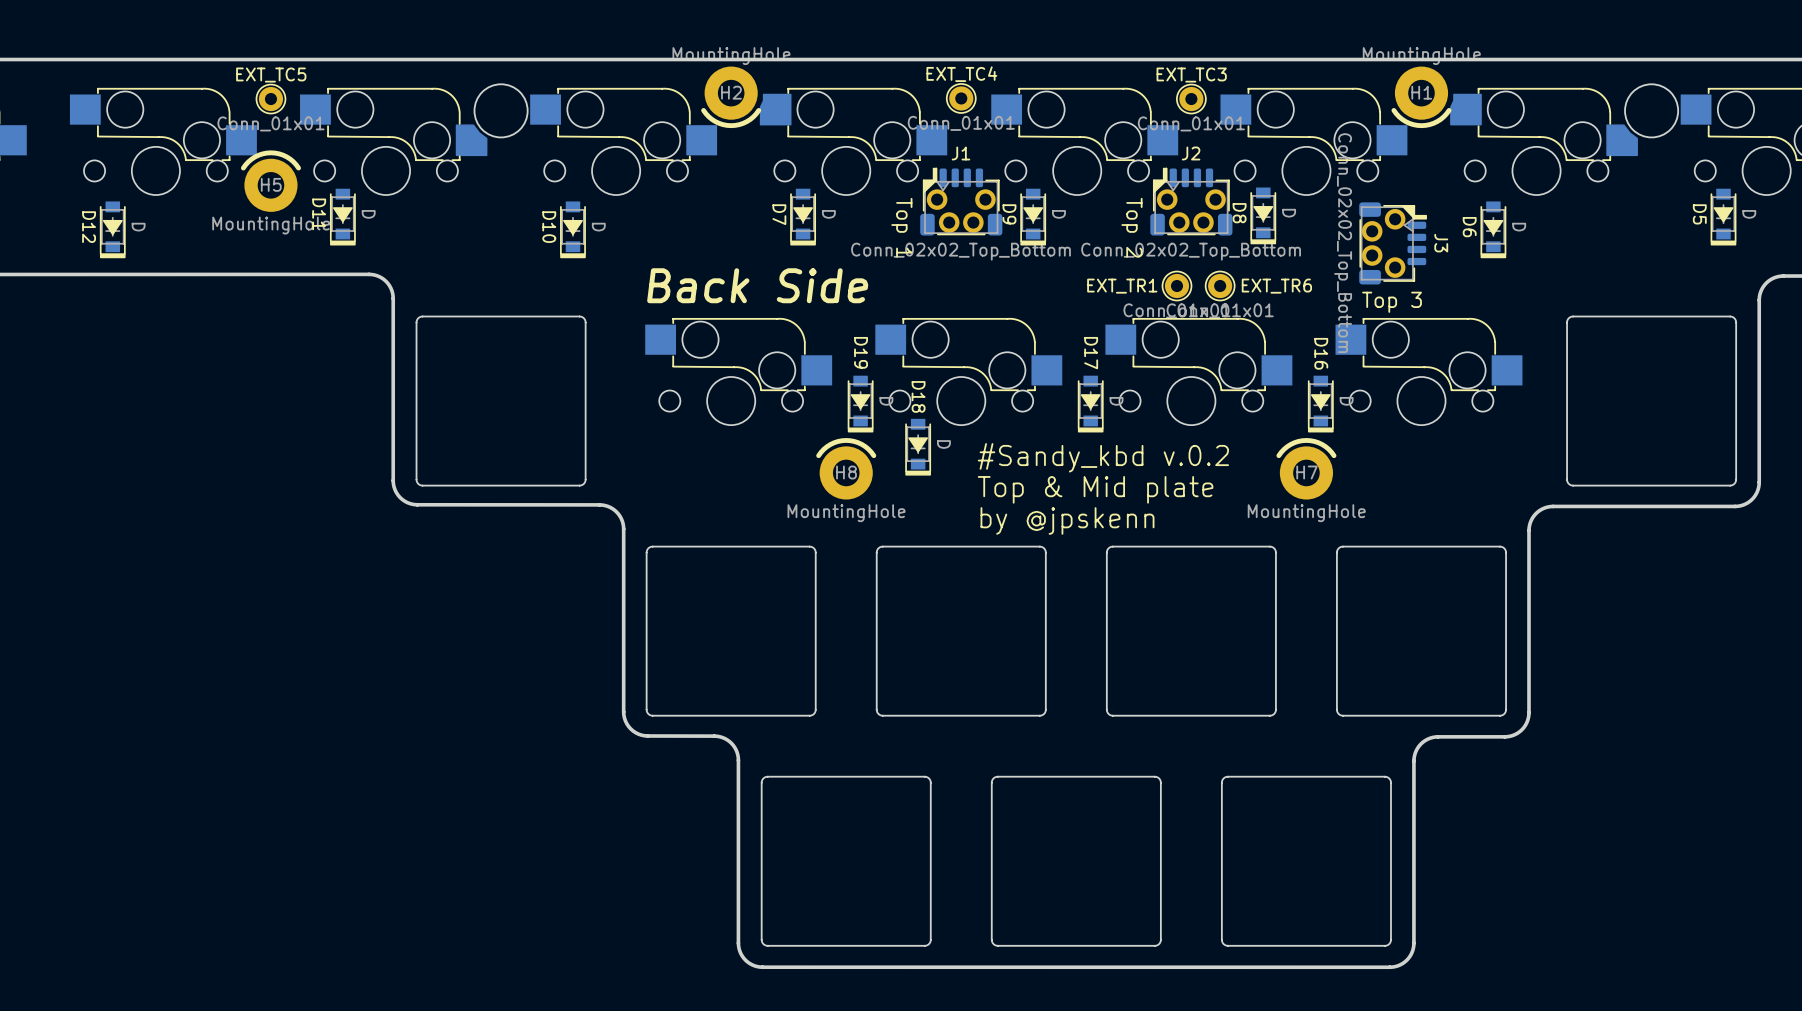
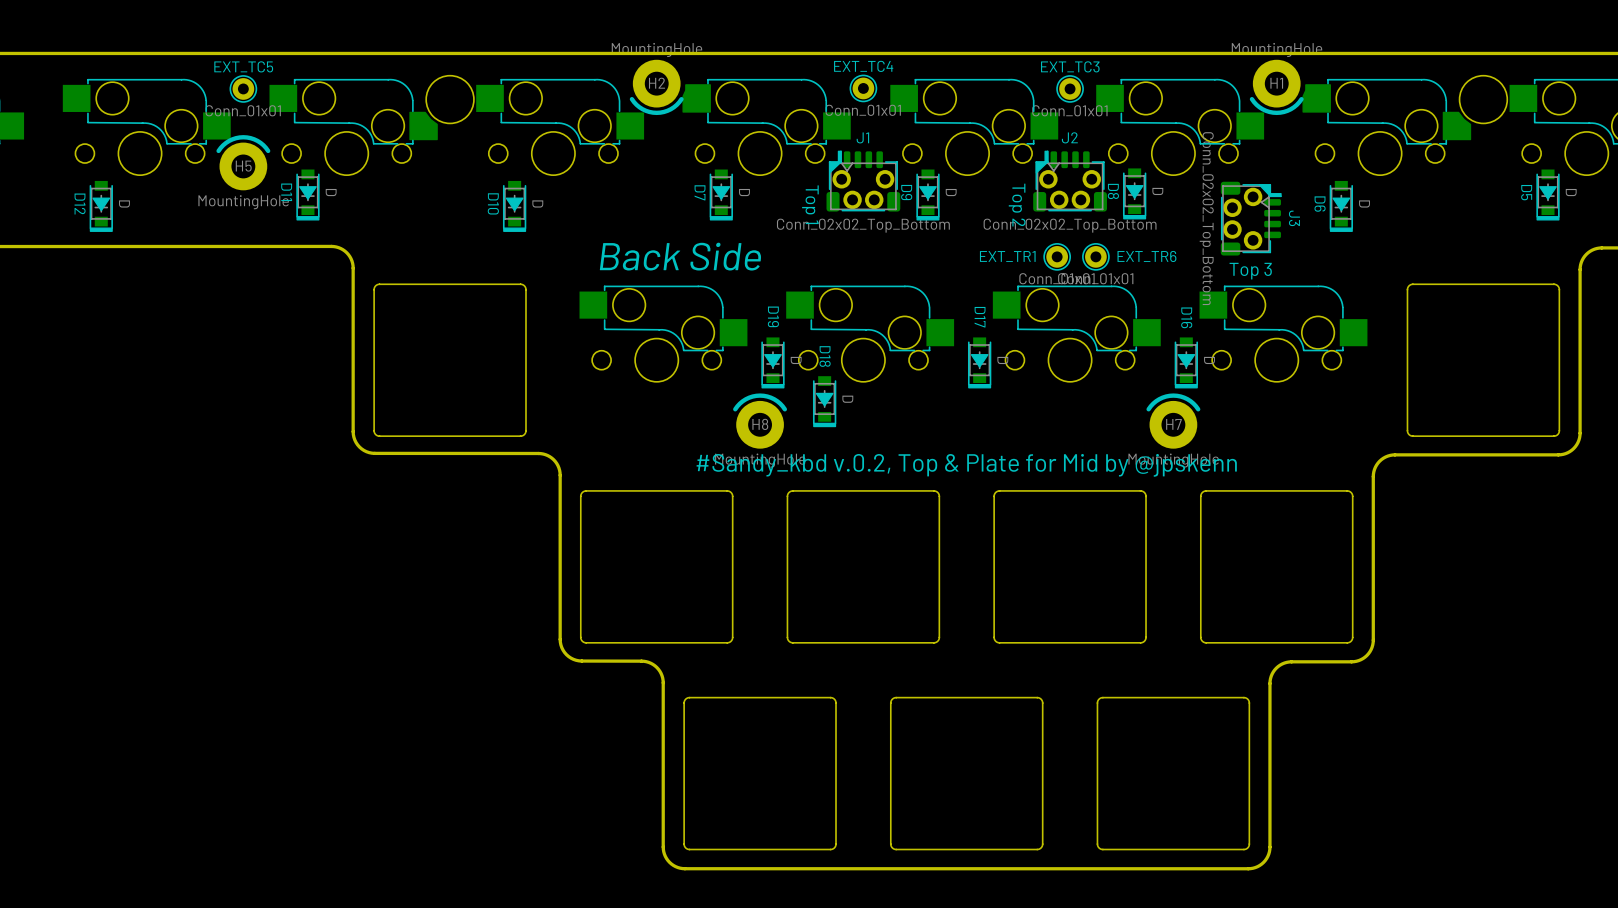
text: #Sandy_kbd v.0.2 (1103, 457) -> none
text: Top & Mid plate (1095, 489) -> none
text: none -> #Sandy_kbd v.0.2, Top & Plate for Mid by @jpskenn (966, 465)
text: by @jpskenn (1067, 520) -> none

